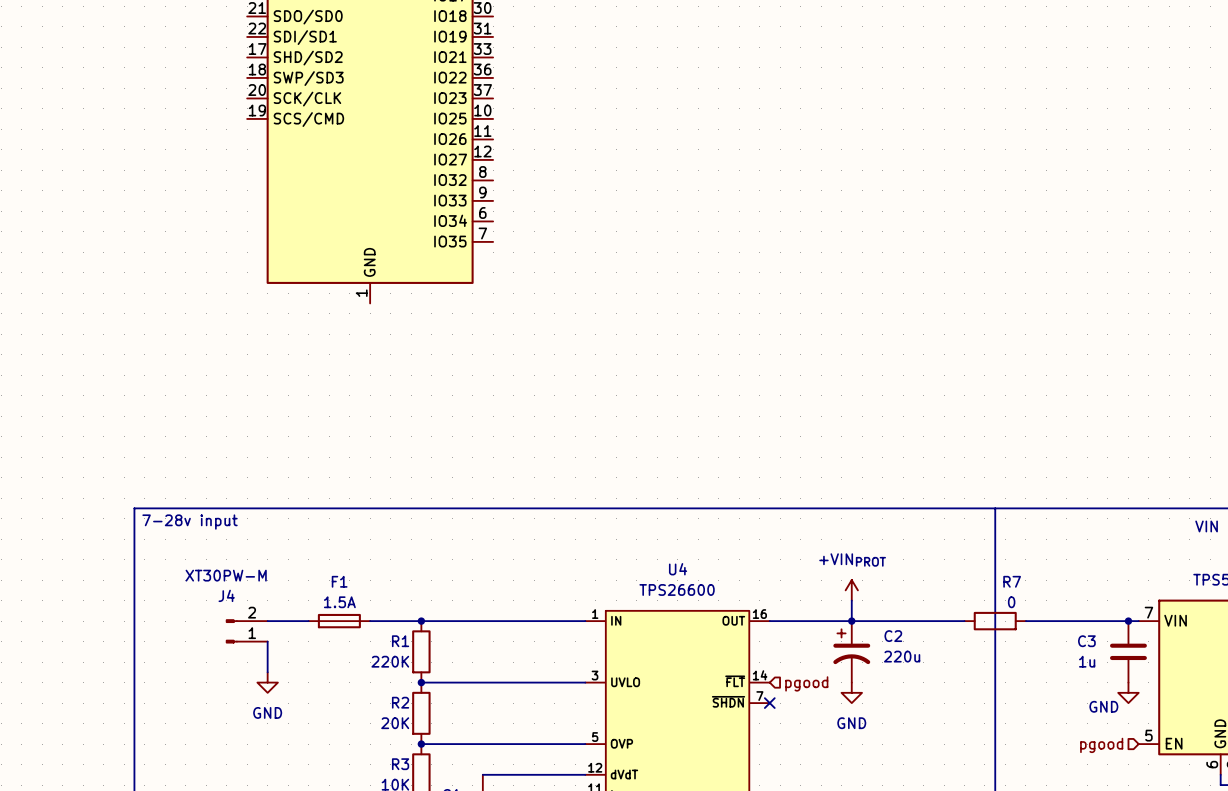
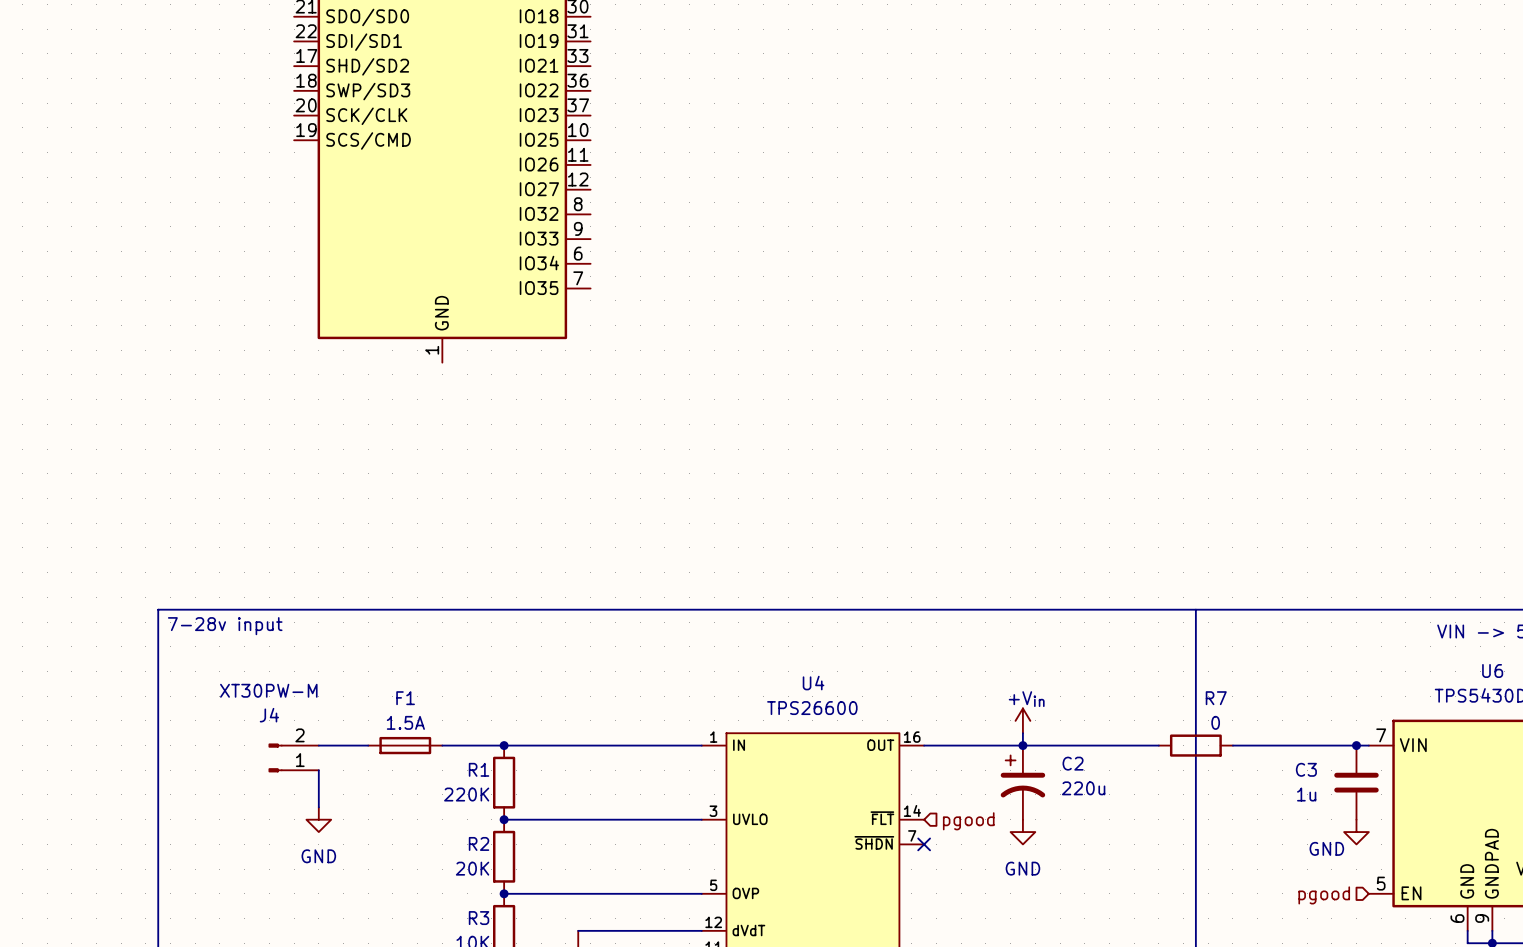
power symbol: +VINPROT (851, 590) -> none
power symbol: none -> +Vin (1022, 720)

